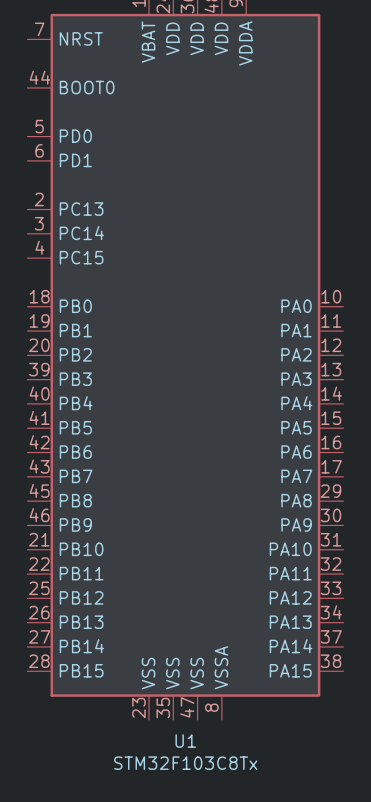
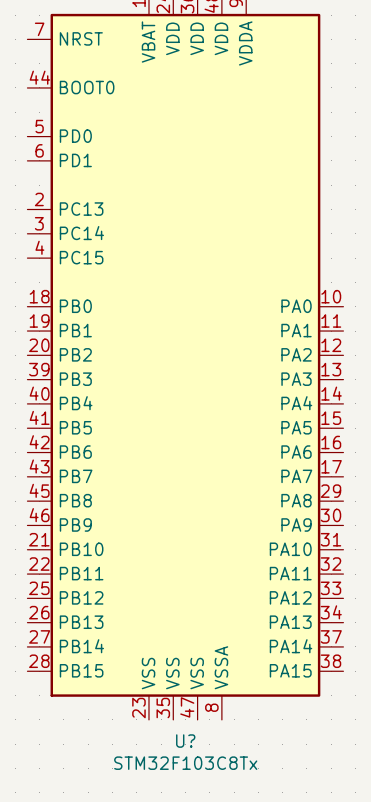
U1 name: U1 (185, 741) -> U? (185, 741)

